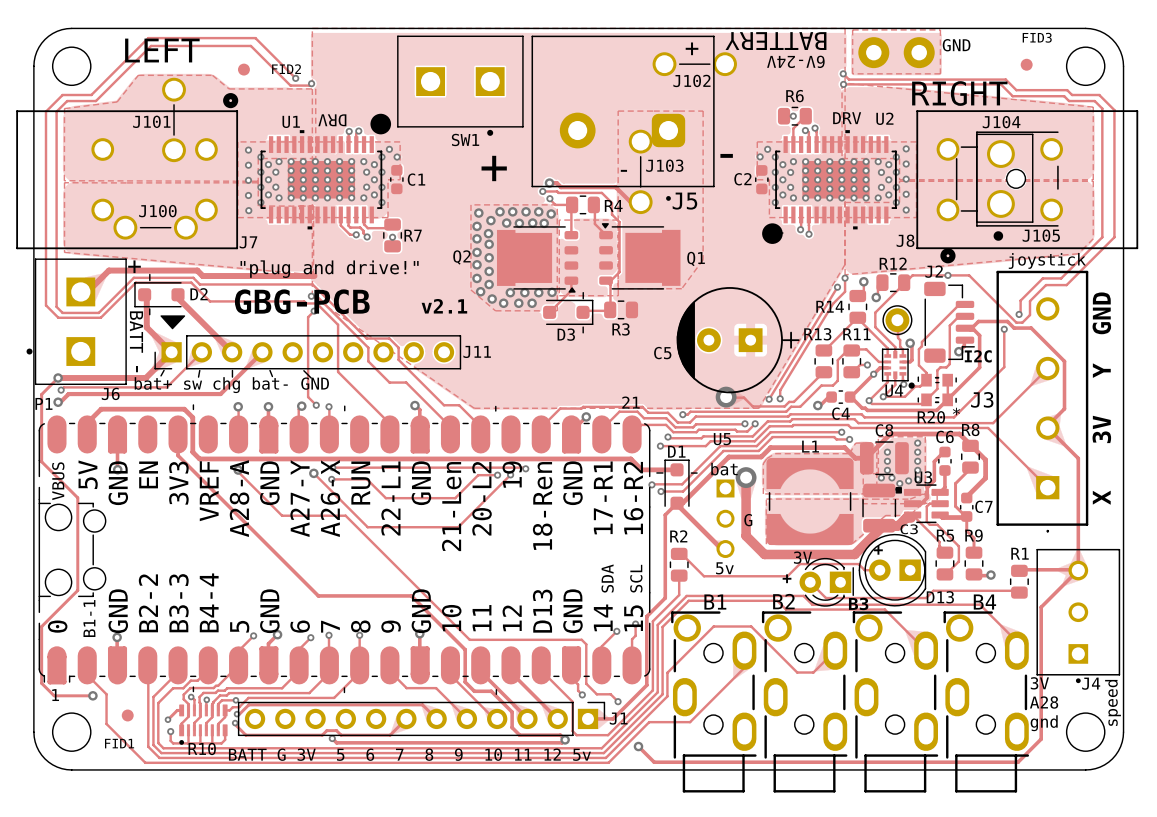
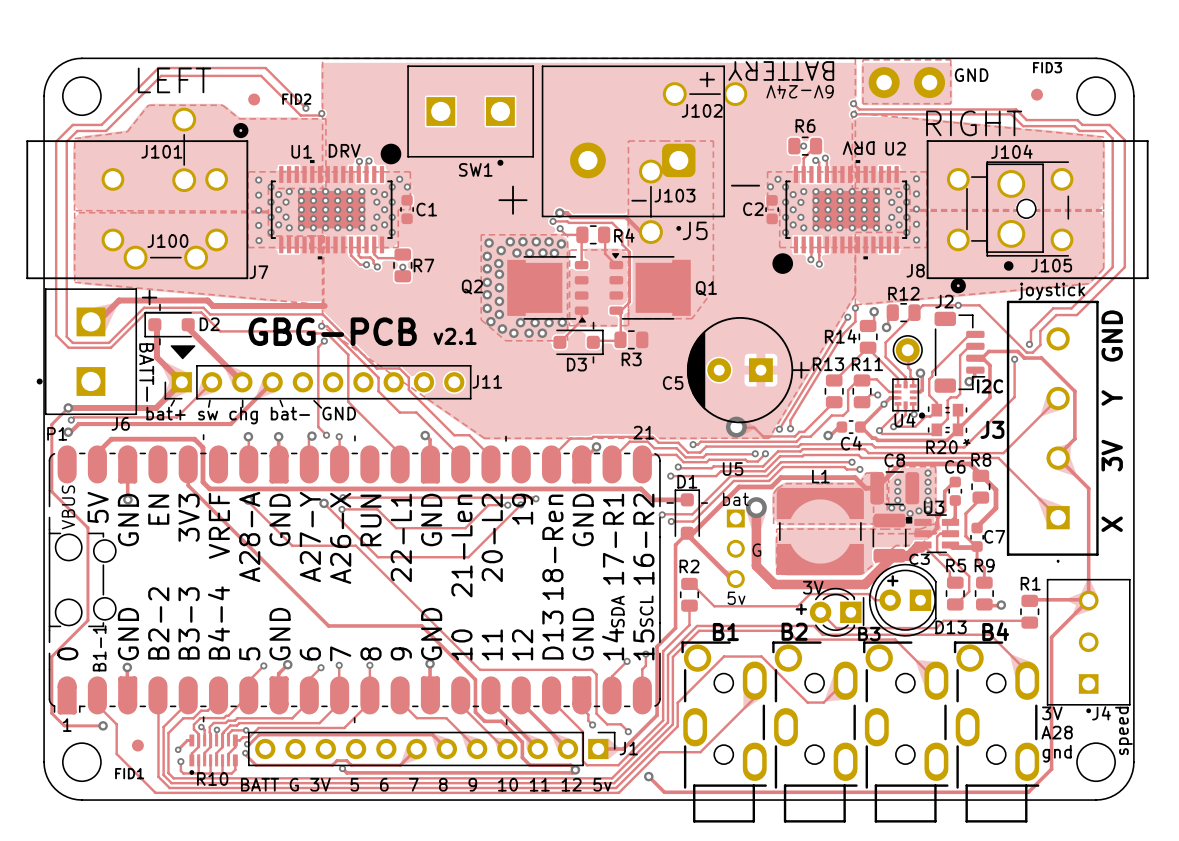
text rotation: 0° (847, 118) -> 180° (858, 148)
text rotation: 0° (332, 120) -> 180° (344, 150)
text: "plug and drive!" (329, 269) -> none

